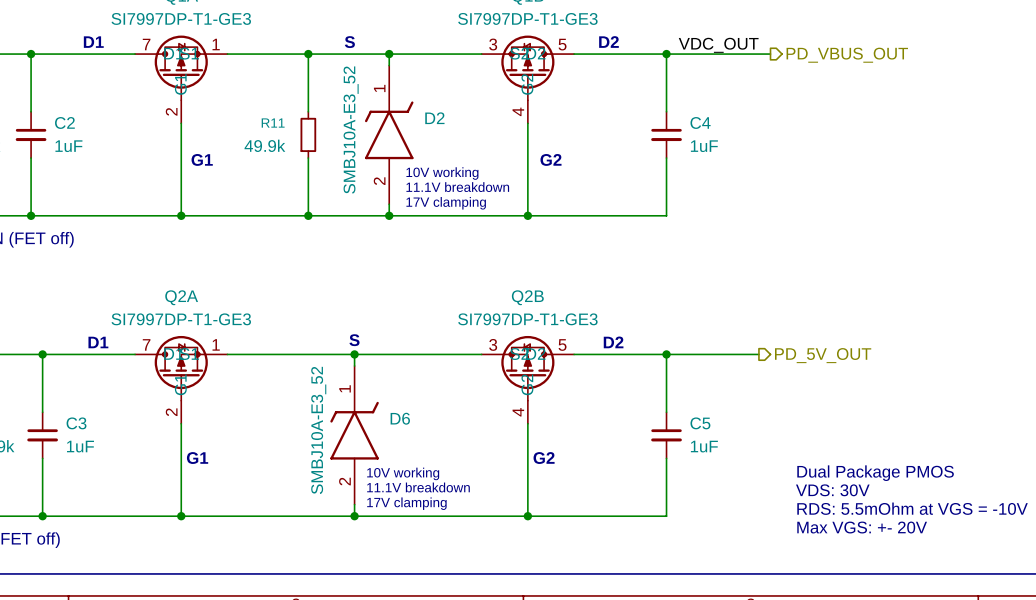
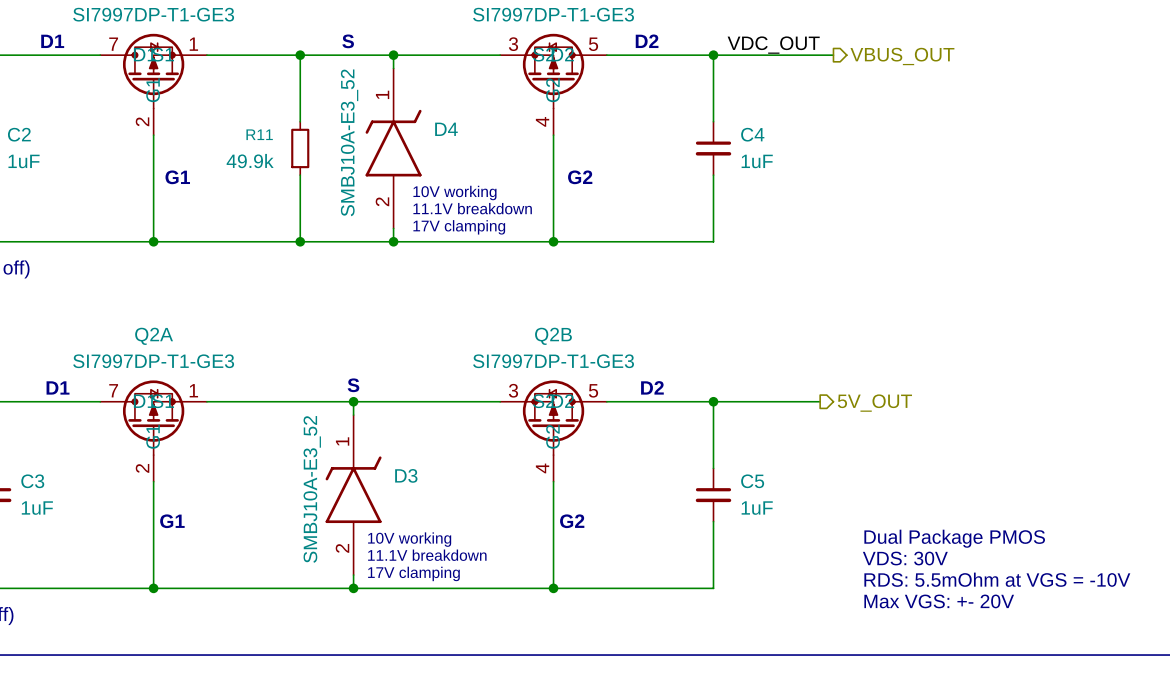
hierarchical label: PD_VBUS_OUT (847, 55) -> VBUS_OUT (902, 56)
D2 name: D2 (434, 118) -> D4 (446, 129)
hierarchical label: PD_5V_OUT (823, 355) -> 5V_OUT (874, 403)
D6 name: D6 (400, 418) -> D3 (406, 475)

